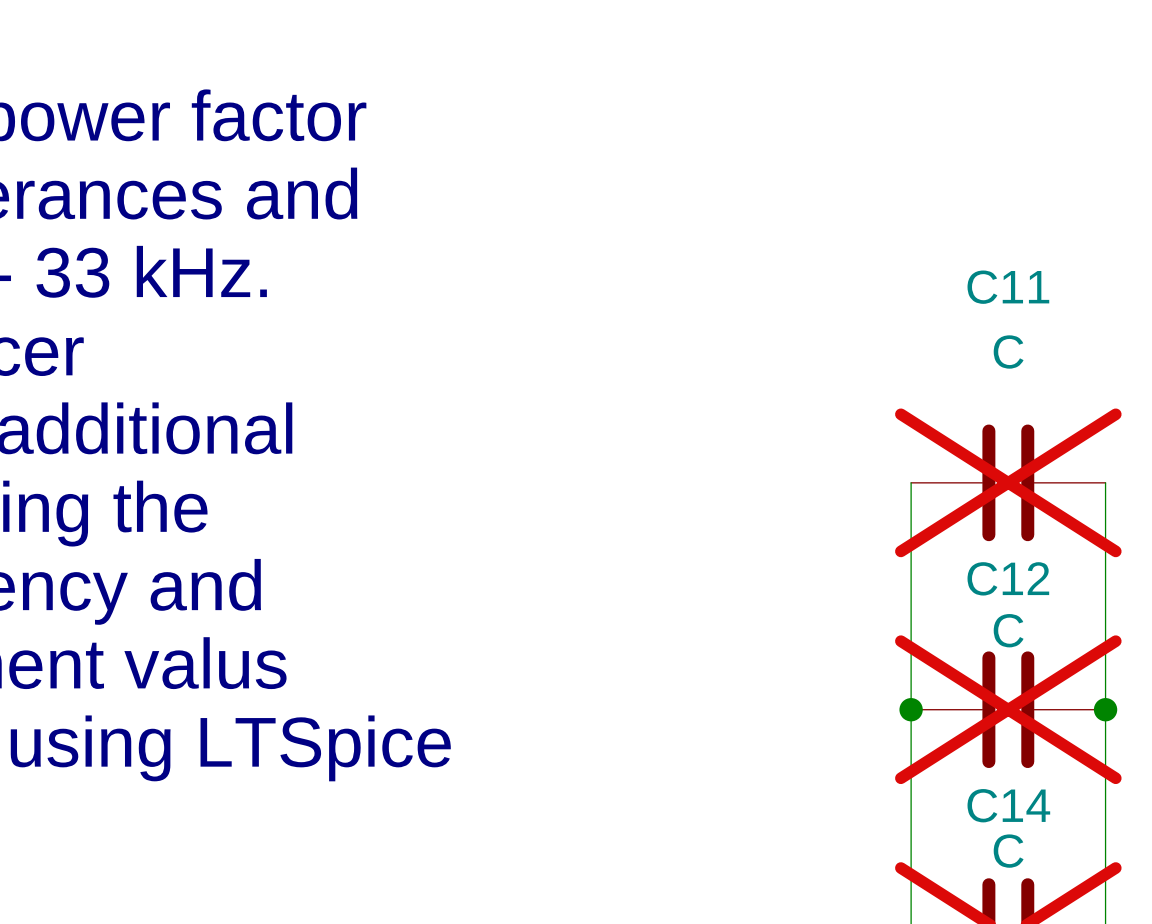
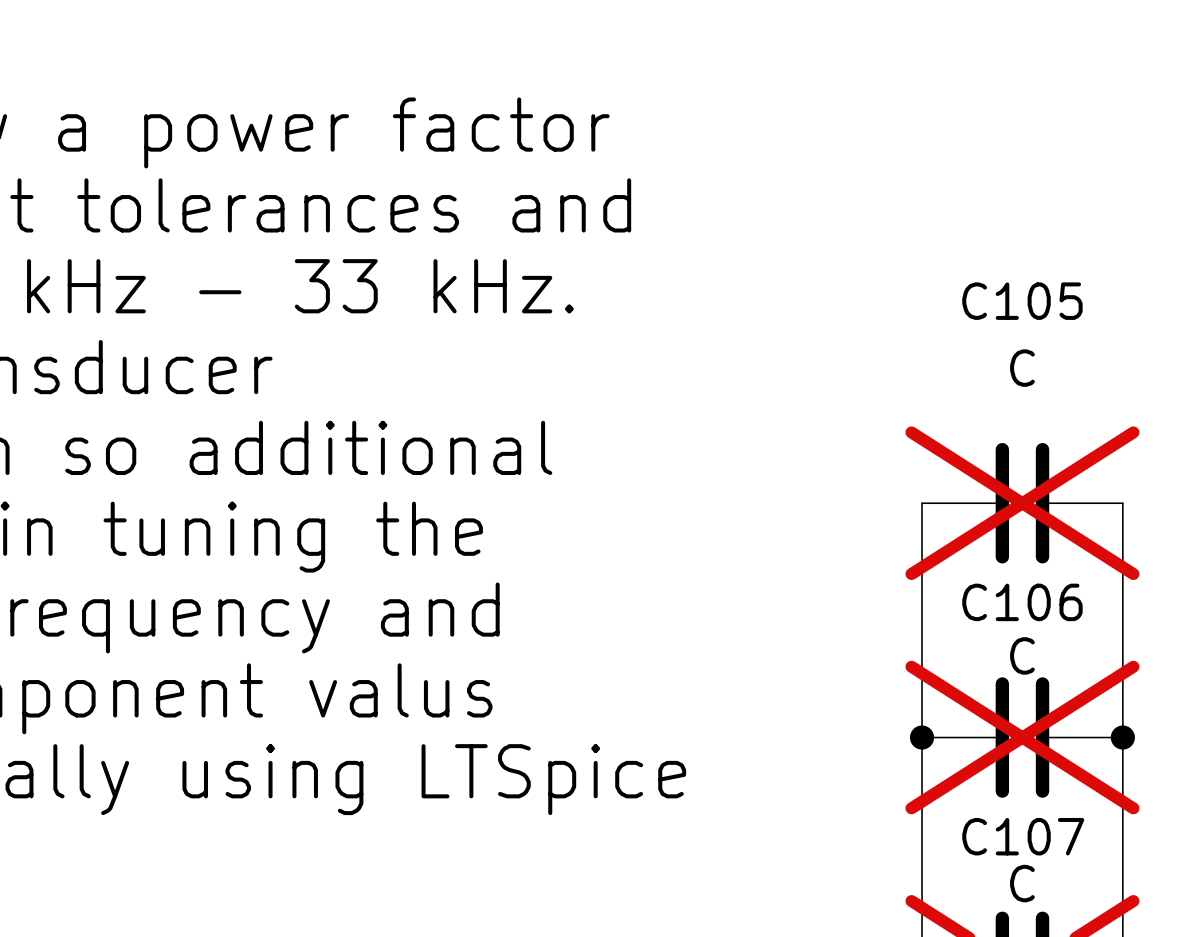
C11 name: C11 (1008, 287) -> C105 (1022, 301)
C12 name: C12 (1008, 578) -> C106 (1022, 602)
C14 name: C14 (1008, 805) -> C107 (1023, 836)

